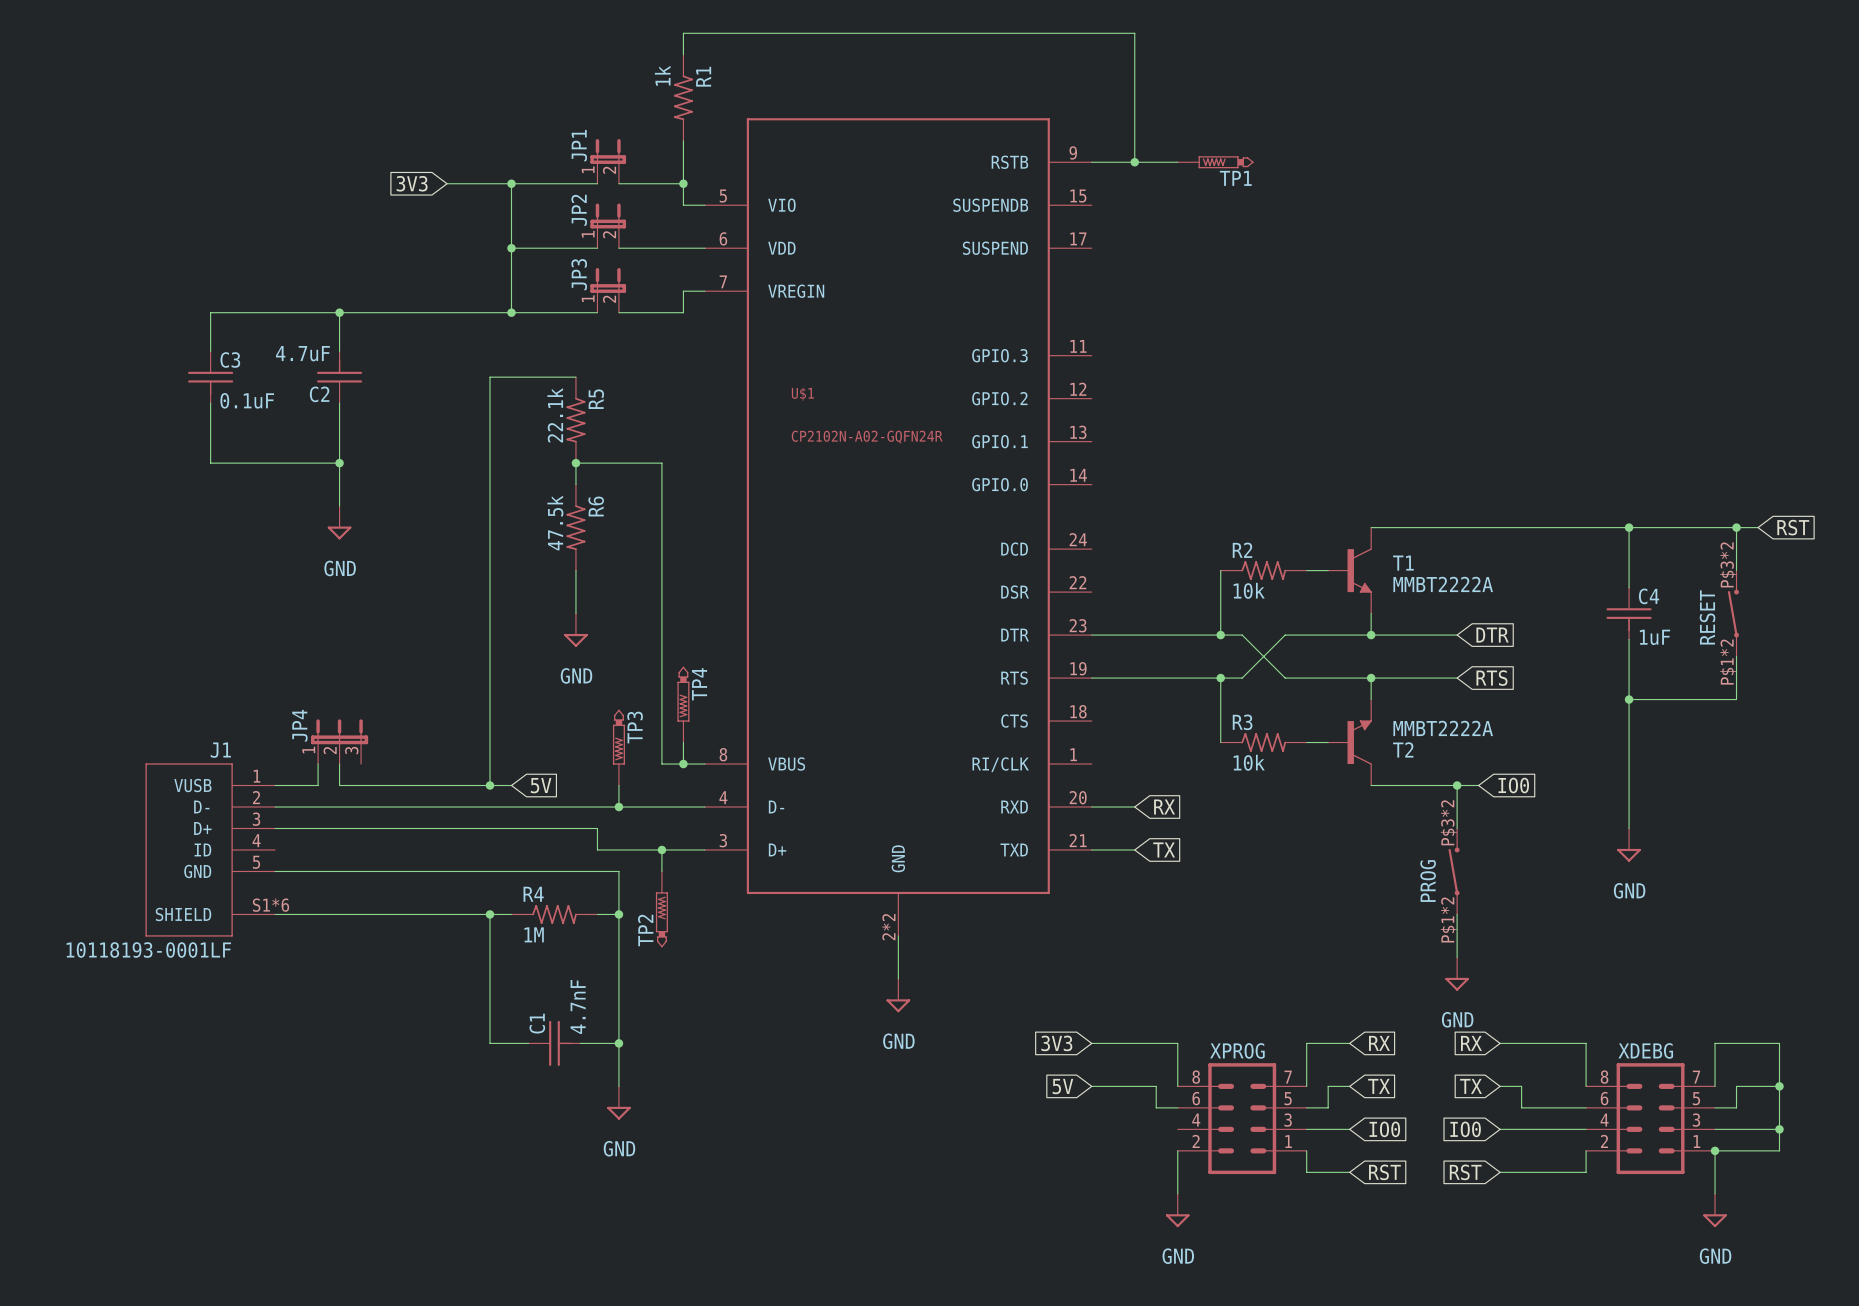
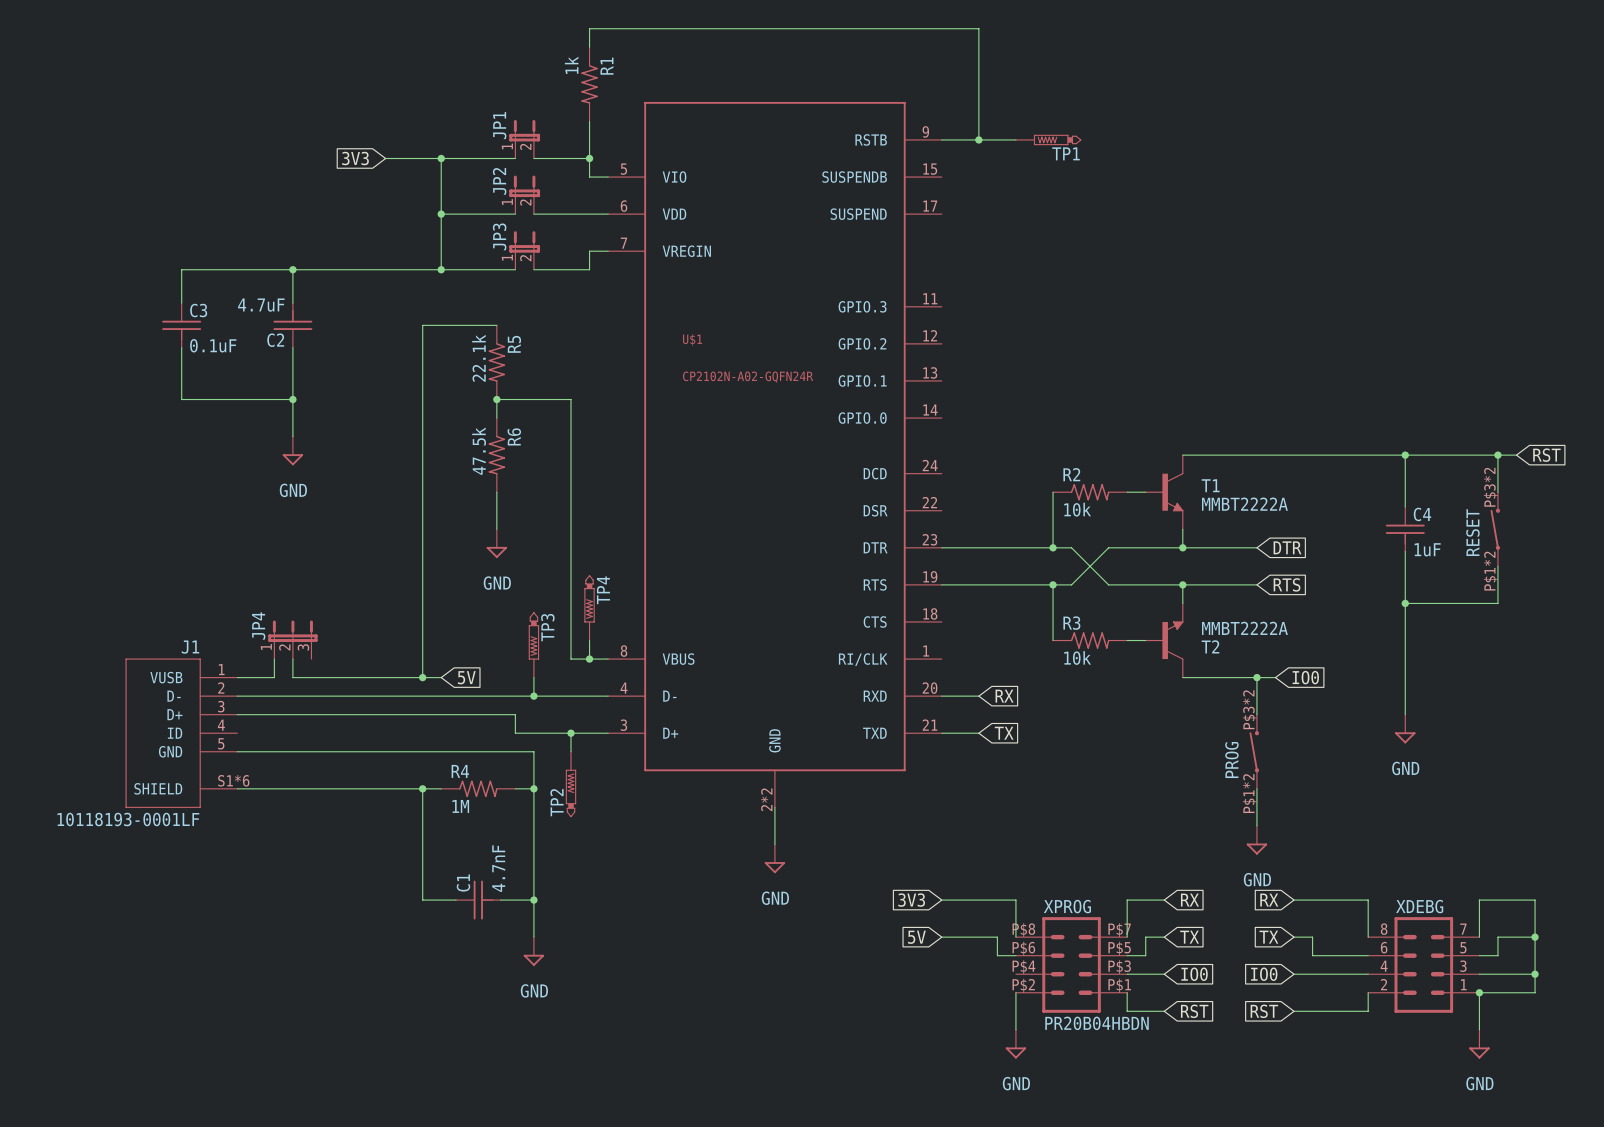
XPROG pin number: 8 (1196, 1077) -> P$8 (1023, 930)
XPROG pin number: 7 (1288, 1077) -> P$7 (1119, 930)
XPROG pin number: 6 (1196, 1098) -> P$6 (1023, 948)
XPROG pin number: 5 (1288, 1098) -> P$5 (1119, 948)
XPROG pin number: 4 (1196, 1120) -> P$4 (1023, 967)
XPROG pin number: 3 (1288, 1120) -> P$3 (1119, 967)
XPROG pin number: 2 (1196, 1141) -> P$2 (1023, 985)
XPROG pin number: 1 (1288, 1141) -> P$1 (1119, 985)
XPROG value: none -> PR20B04HBDN (1097, 1023)

